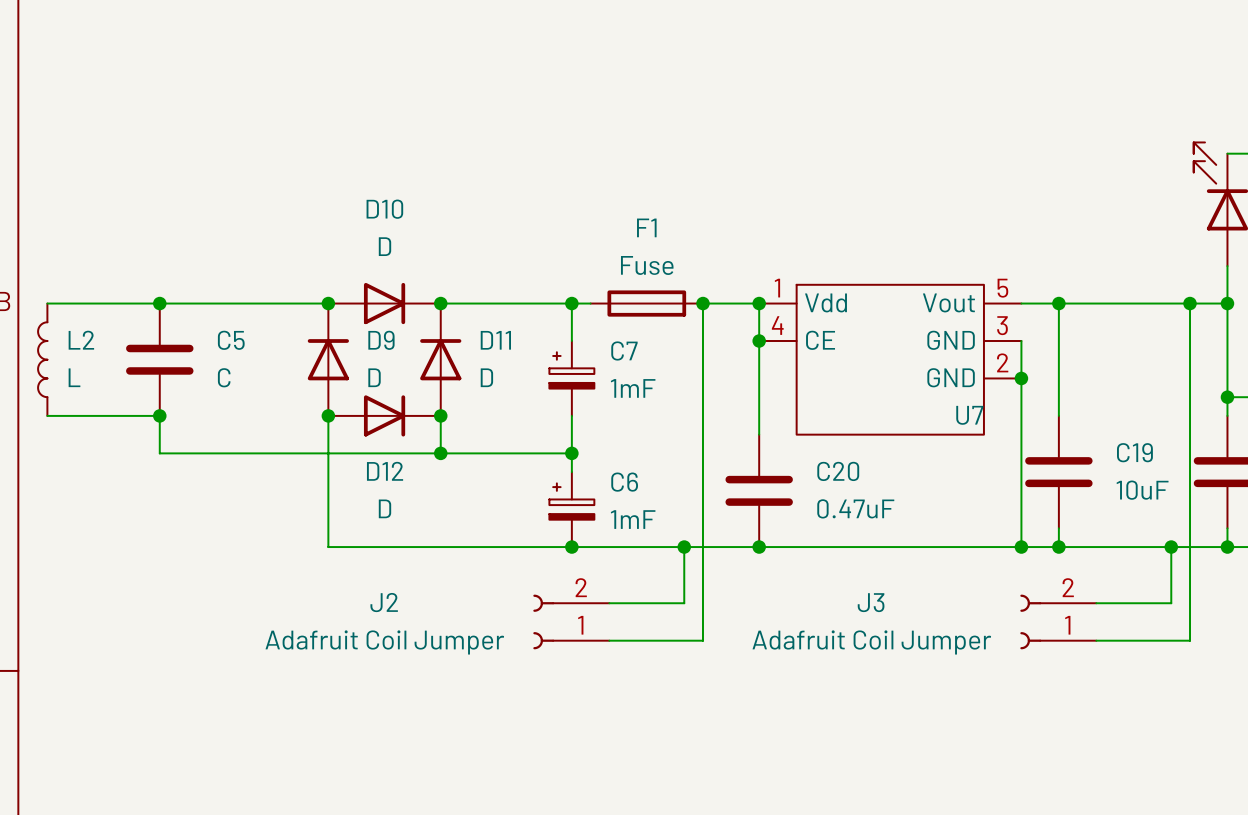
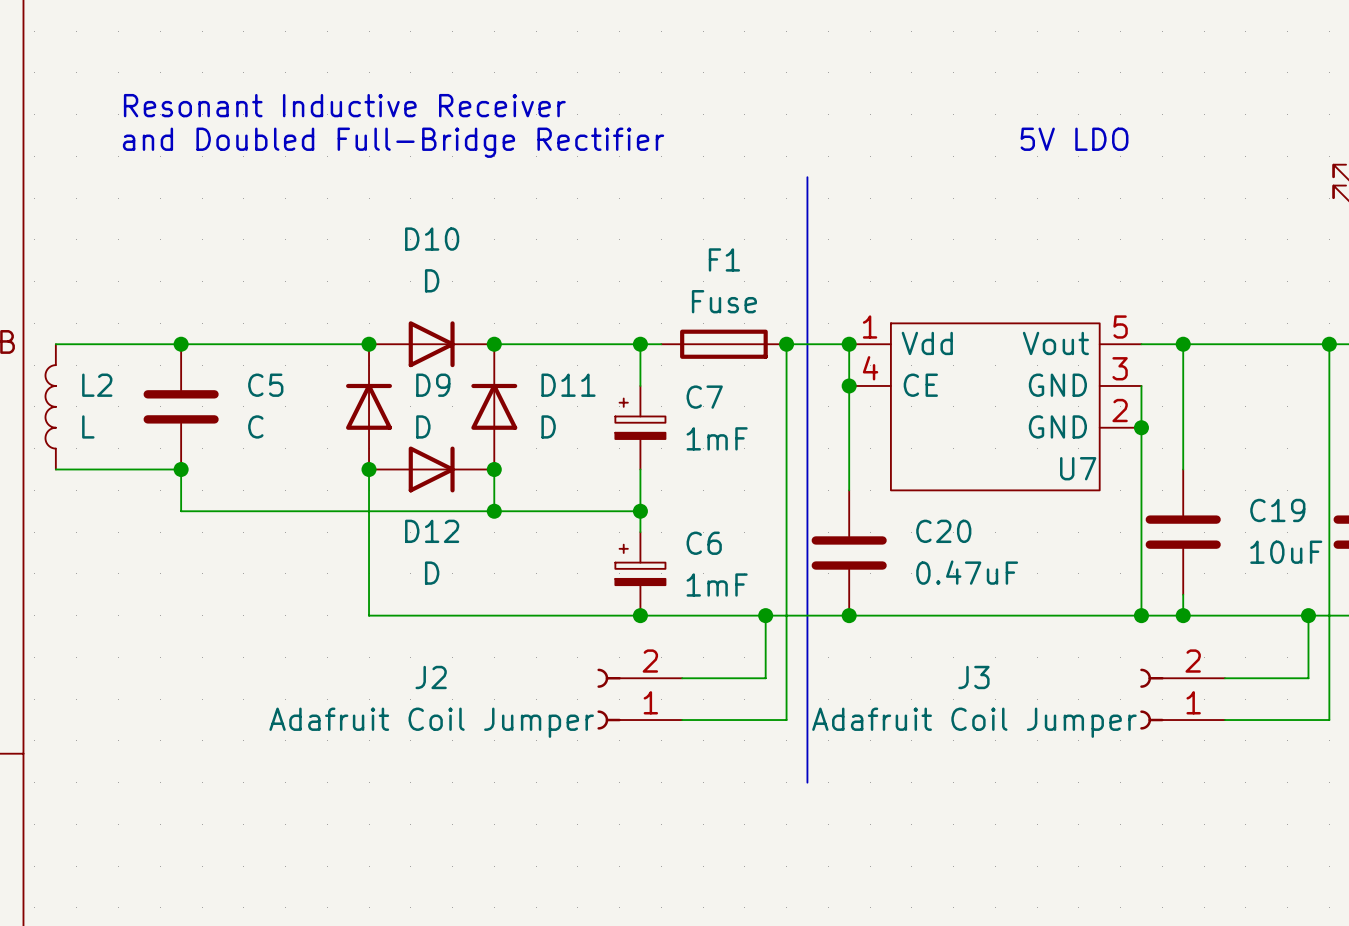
text: none -> Resonant Inductive Receiver (344, 105)
text: none -> 5V LDO (1074, 139)
text: none -> and Doubled Full-Bridge Rectifier (393, 142)
line: none -> (807, 177) (807, 782)

